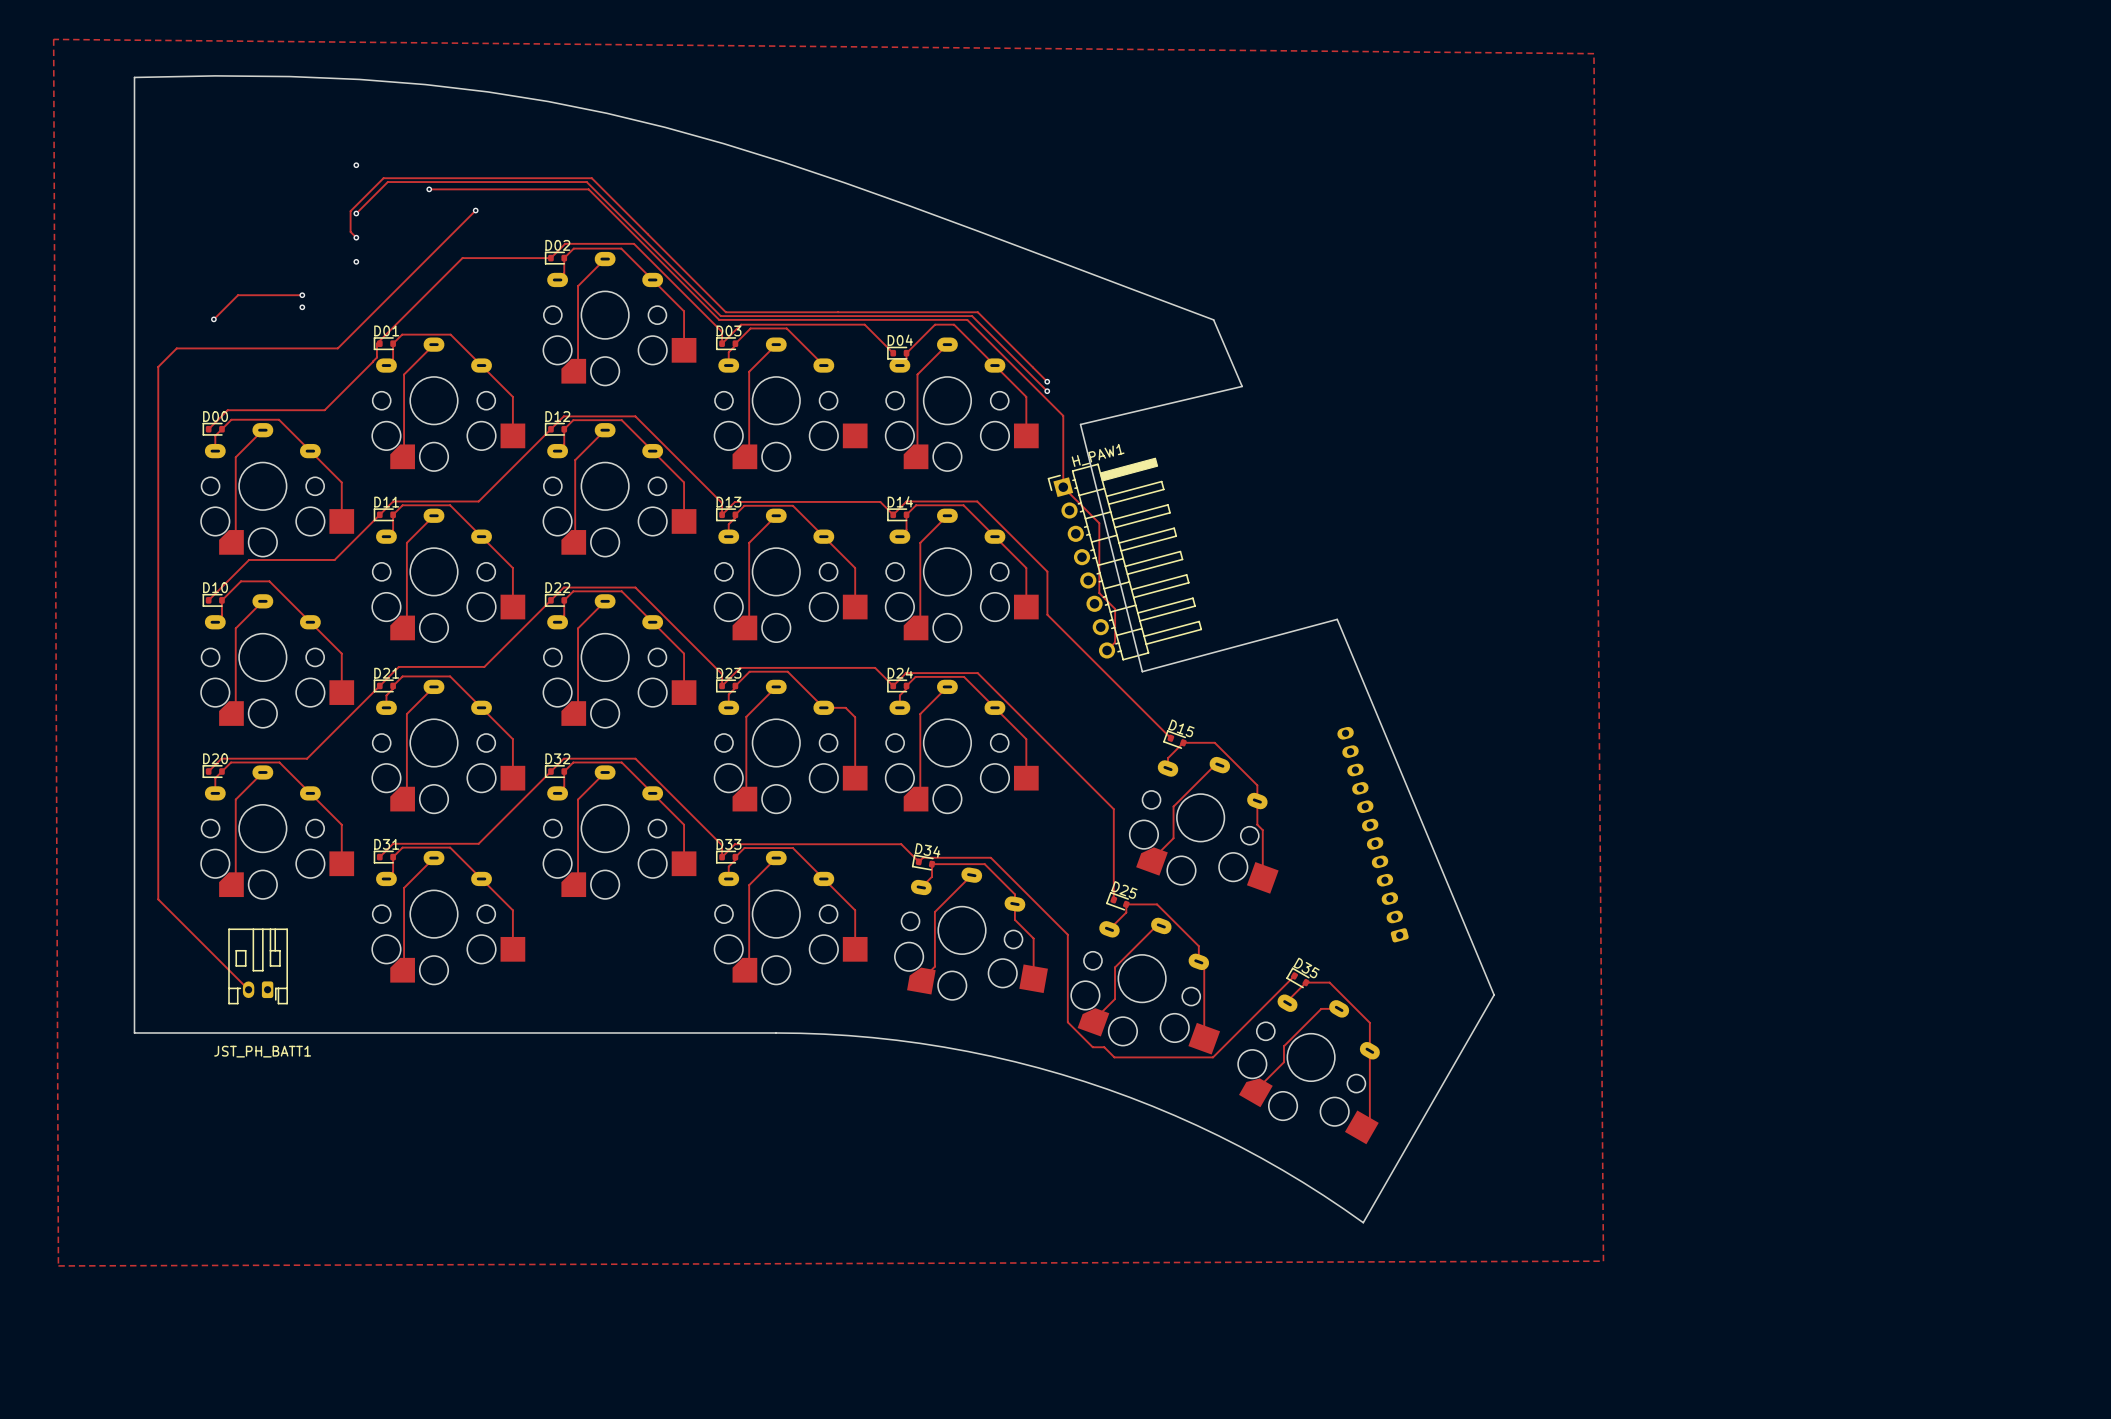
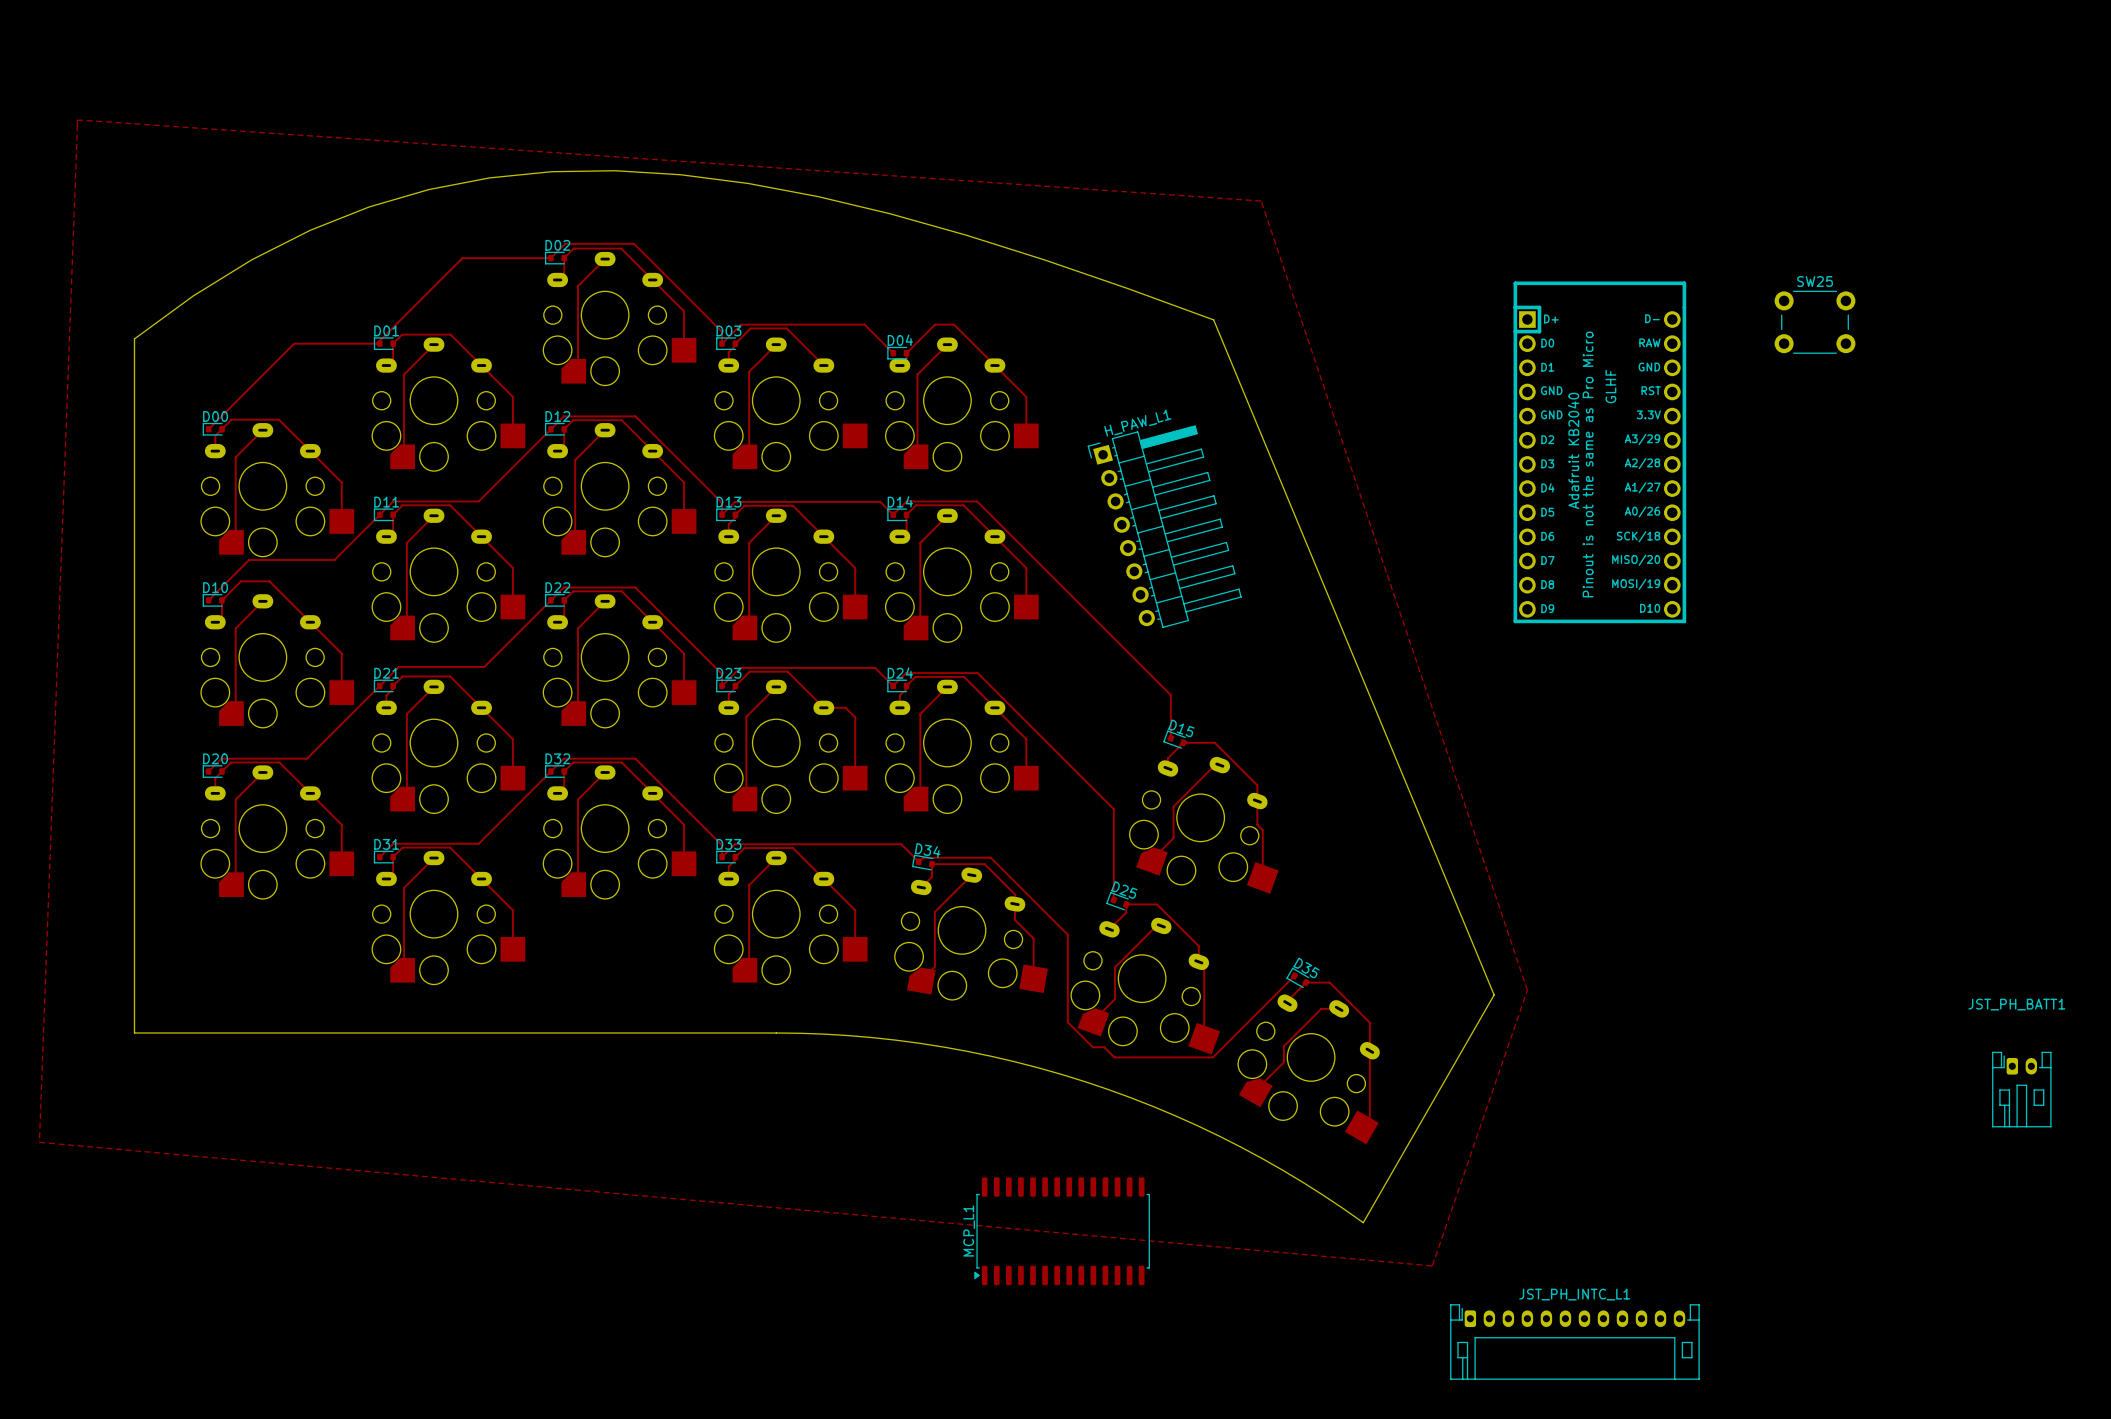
zone outline: (53, 39) (58, 1265) (1603, 1261) (1593, 53) (53, 39) -> (77, 120) (39, 1142) (1432, 1265) (1527, 990) (1261, 201) (77, 120)
via: (356, 165) -> none
track: (429, 189) (588, 189) (719, 319) (967, 319) (1063, 415) (1063, 487) (1099, 523) (1099, 593) (1115, 608) (1115, 642) (1107, 650) -> none
via: (429, 189) -> none
track: (475, 210) (337, 348) (176, 348) (158, 366) (158, 899) (248, 989) -> none
via: (475, 210) -> none
track: (356, 213) (387, 182) (586, 182) (720, 316) (972, 316) (1047, 391) -> none
via: (356, 213) -> none
track: (356, 237) (350, 231) (350, 211) (383, 178) (591, 178) (725, 312) (977, 312) (1047, 381) -> none
via: (356, 237) -> none
via: (356, 261) -> none
track: (302, 295) (238, 295) (213, 319) -> none
via: (302, 295) -> none
via: (302, 307) -> none
via: (213, 319) -> none
SW25: none -> (1815, 322)
board edge: (134, 338) (134, 77) (215, 75) (289, 76) (425, 84) (548, 101) (665, 127) (723, 143) (844, 182) (1213, 319) (1242, 386) (1080, 424) (1142, 671) (1337, 619) (1494, 994) -> (134, 338) (193, 296) (251, 259) (310, 230) (369, 206) (429, 189) (489, 177) (551, 171) (615, 170) (680, 174) (748, 183) (818, 196) (890, 213) (966, 235) (1045, 260) (1213, 319) (1494, 994)
track: (376, 343) (376, 357) (324, 410) (227, 410) -> (376, 343) (294, 343) (227, 410)
via: (1047, 381) -> none
via: (1047, 391) -> none
part: none -> (1599, 452)
H_PAW_L1: none -> (1164, 526)
H_PAW1: (1124, 558) -> none
track: (1047, 571) (1047, 614) (1170, 738) -> (1047, 571) (1170, 695) (1170, 738)
part: (1373, 834) -> none
JST_PH_BATT1 rotation: 0° (258, 966) -> 180° (2021, 1089)
JST_PH_BATT1 position: (258, 966) -> (2021, 1089)
MCP_L1: none -> (1062, 1231)
JST_PH_INTC_L1: none -> (1574, 1342)

